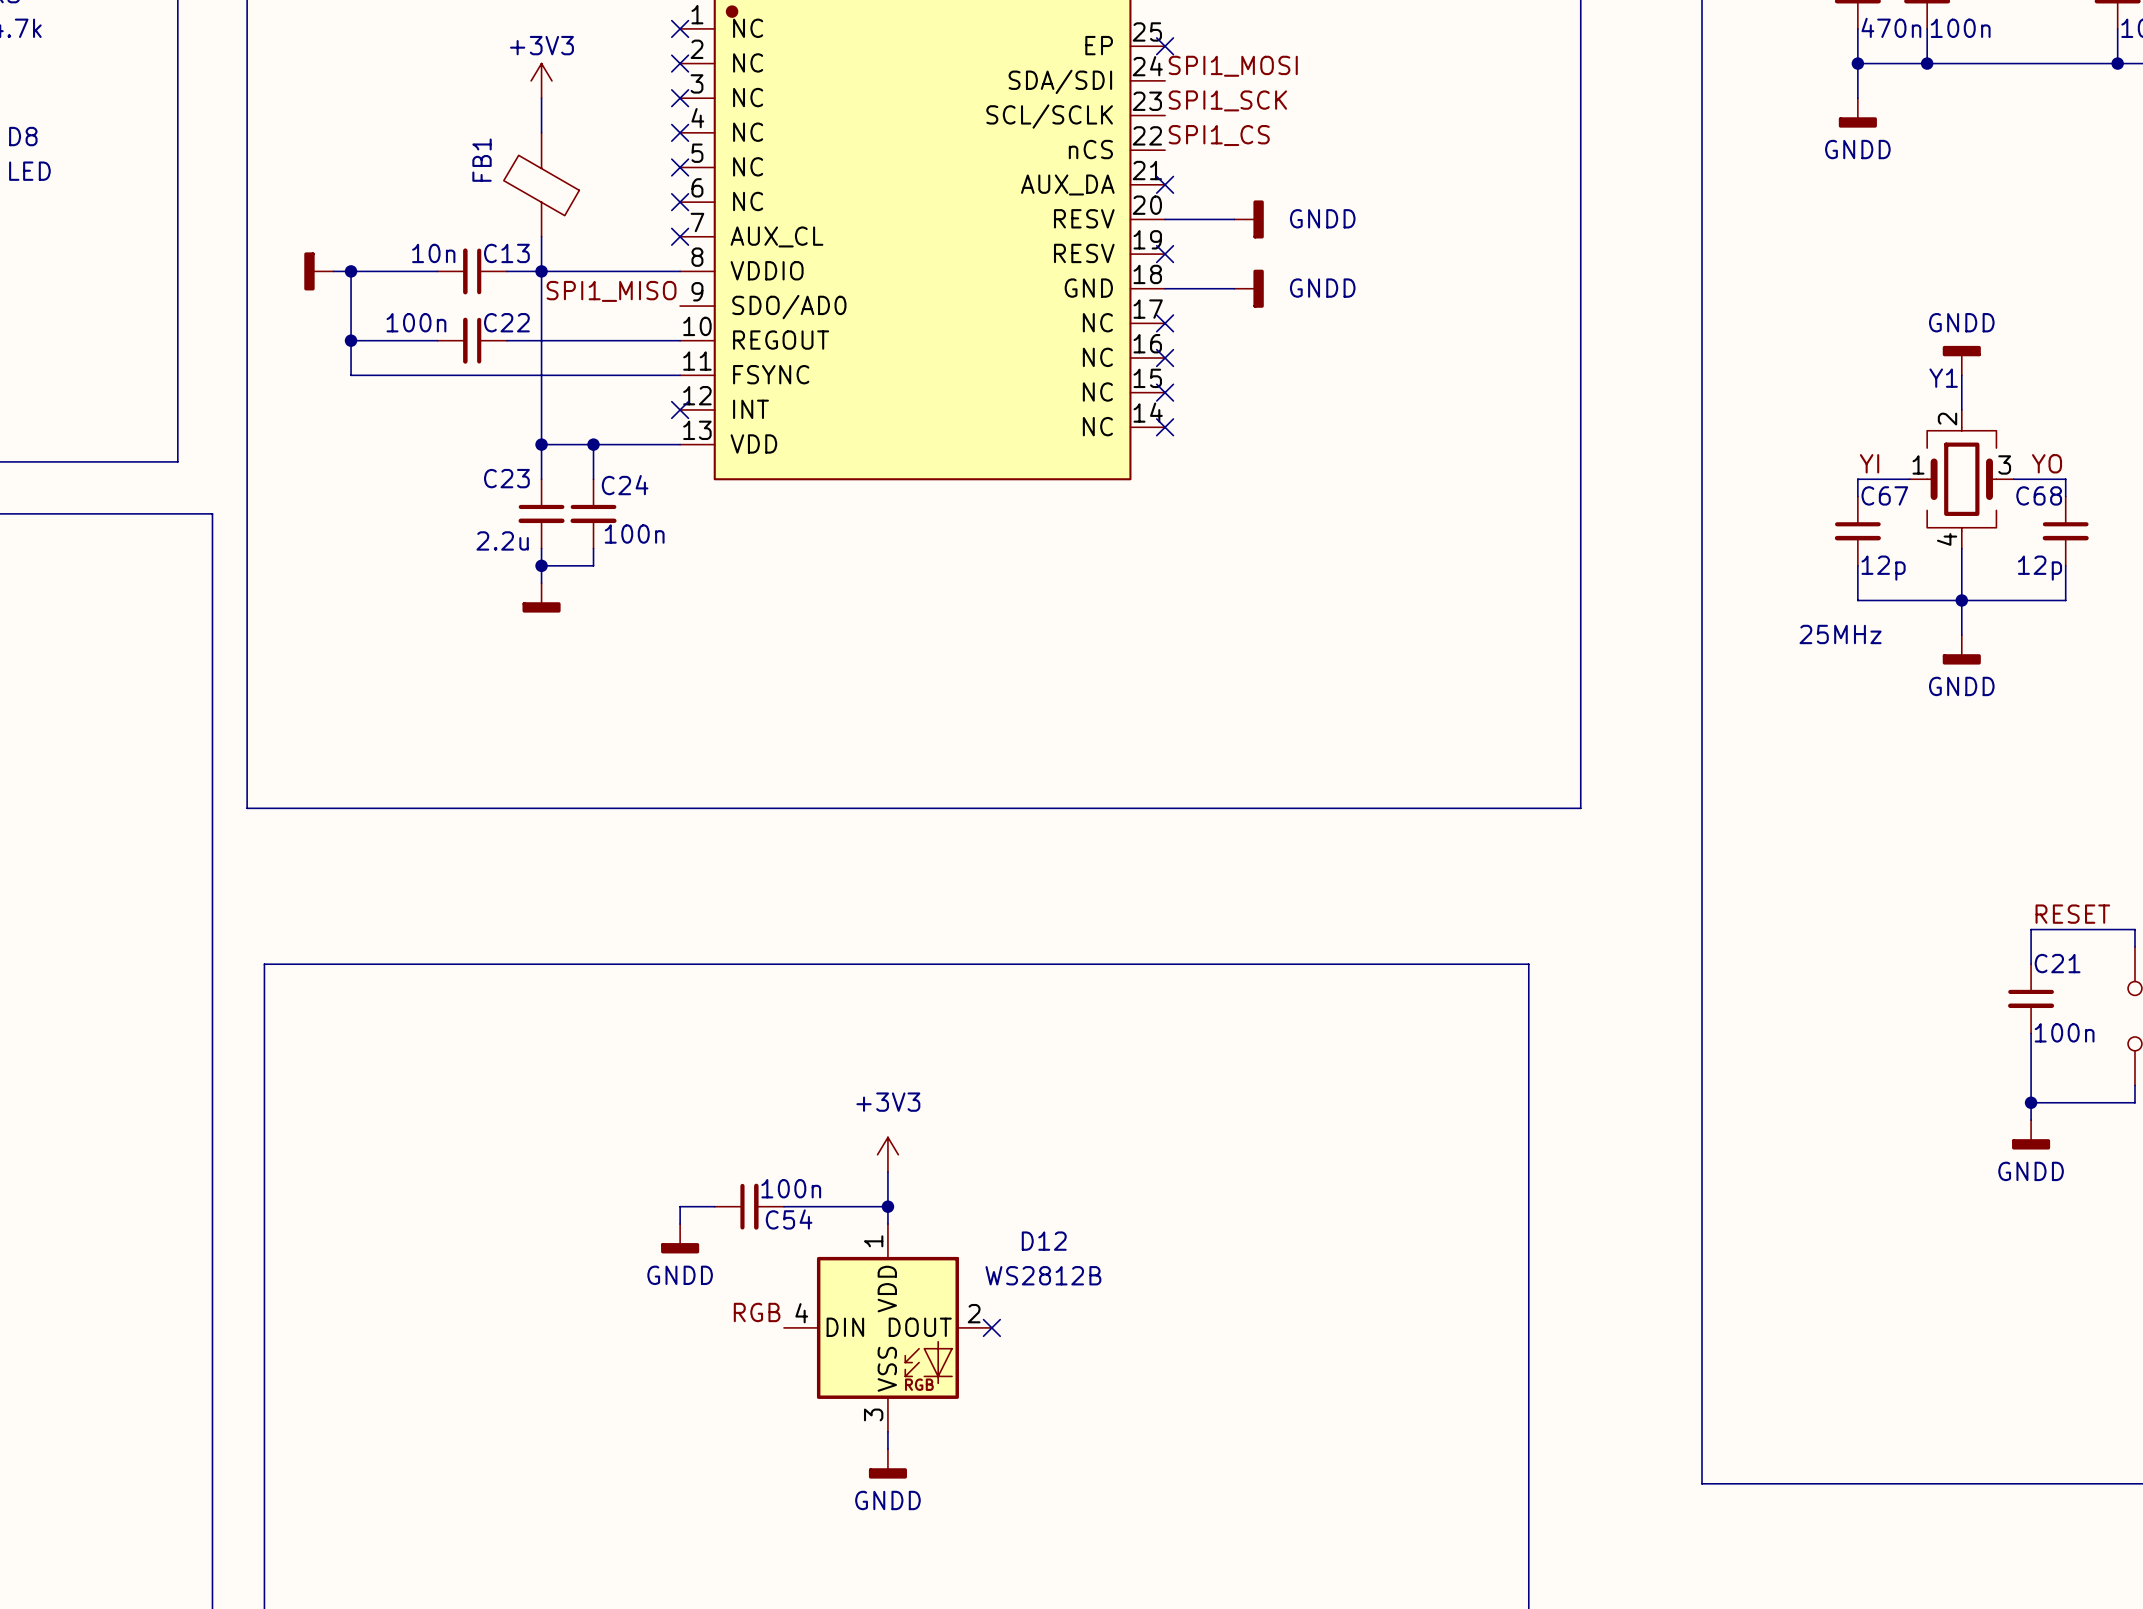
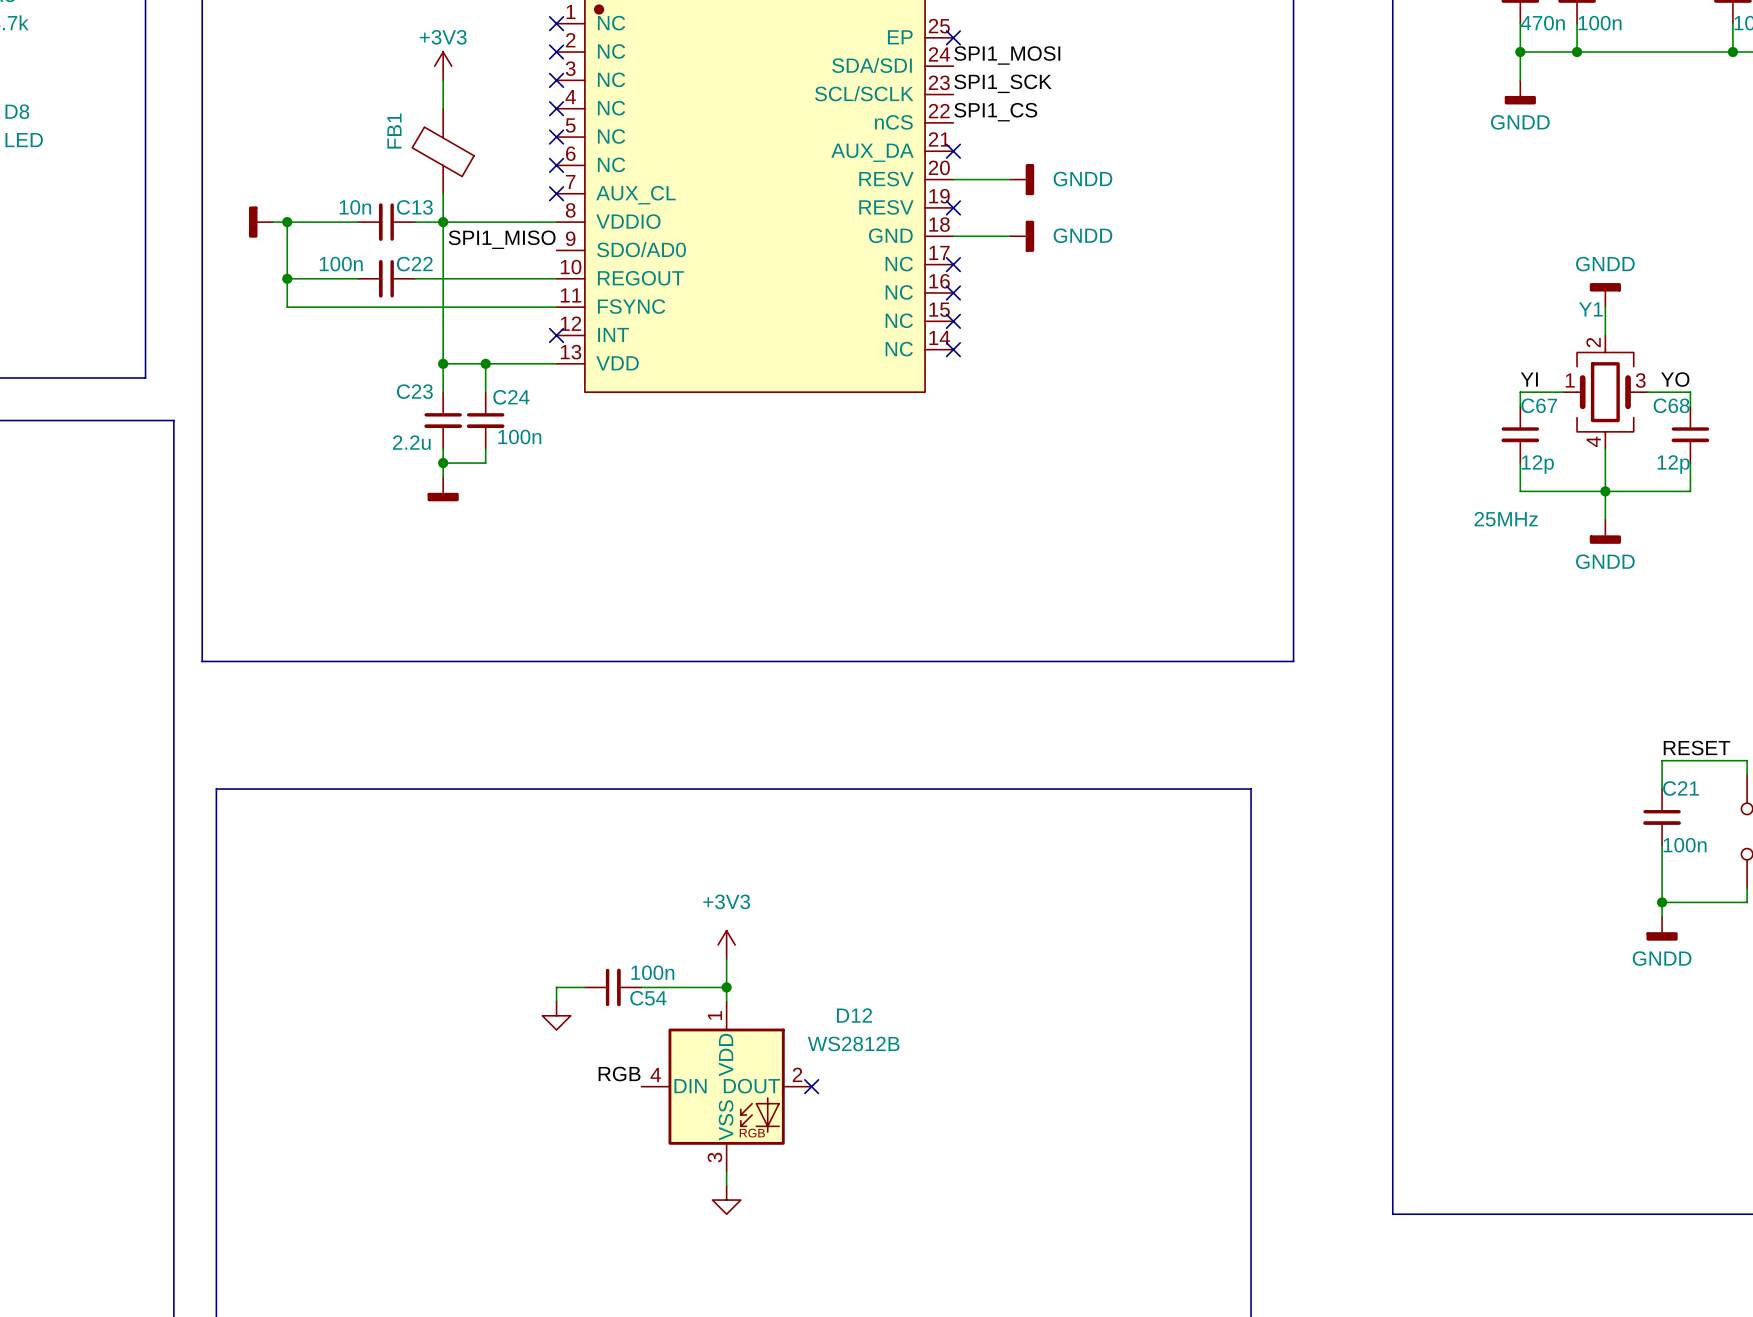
power symbol shape: [661, 1224, 700, 1254] -> [542, 1001, 571, 1030]
power symbol text: GNDD (680, 1275) -> none
power symbol shape: [868, 1449, 908, 1479] -> [712, 1185, 741, 1215]
power symbol text: GNDD (887, 1500) -> none

